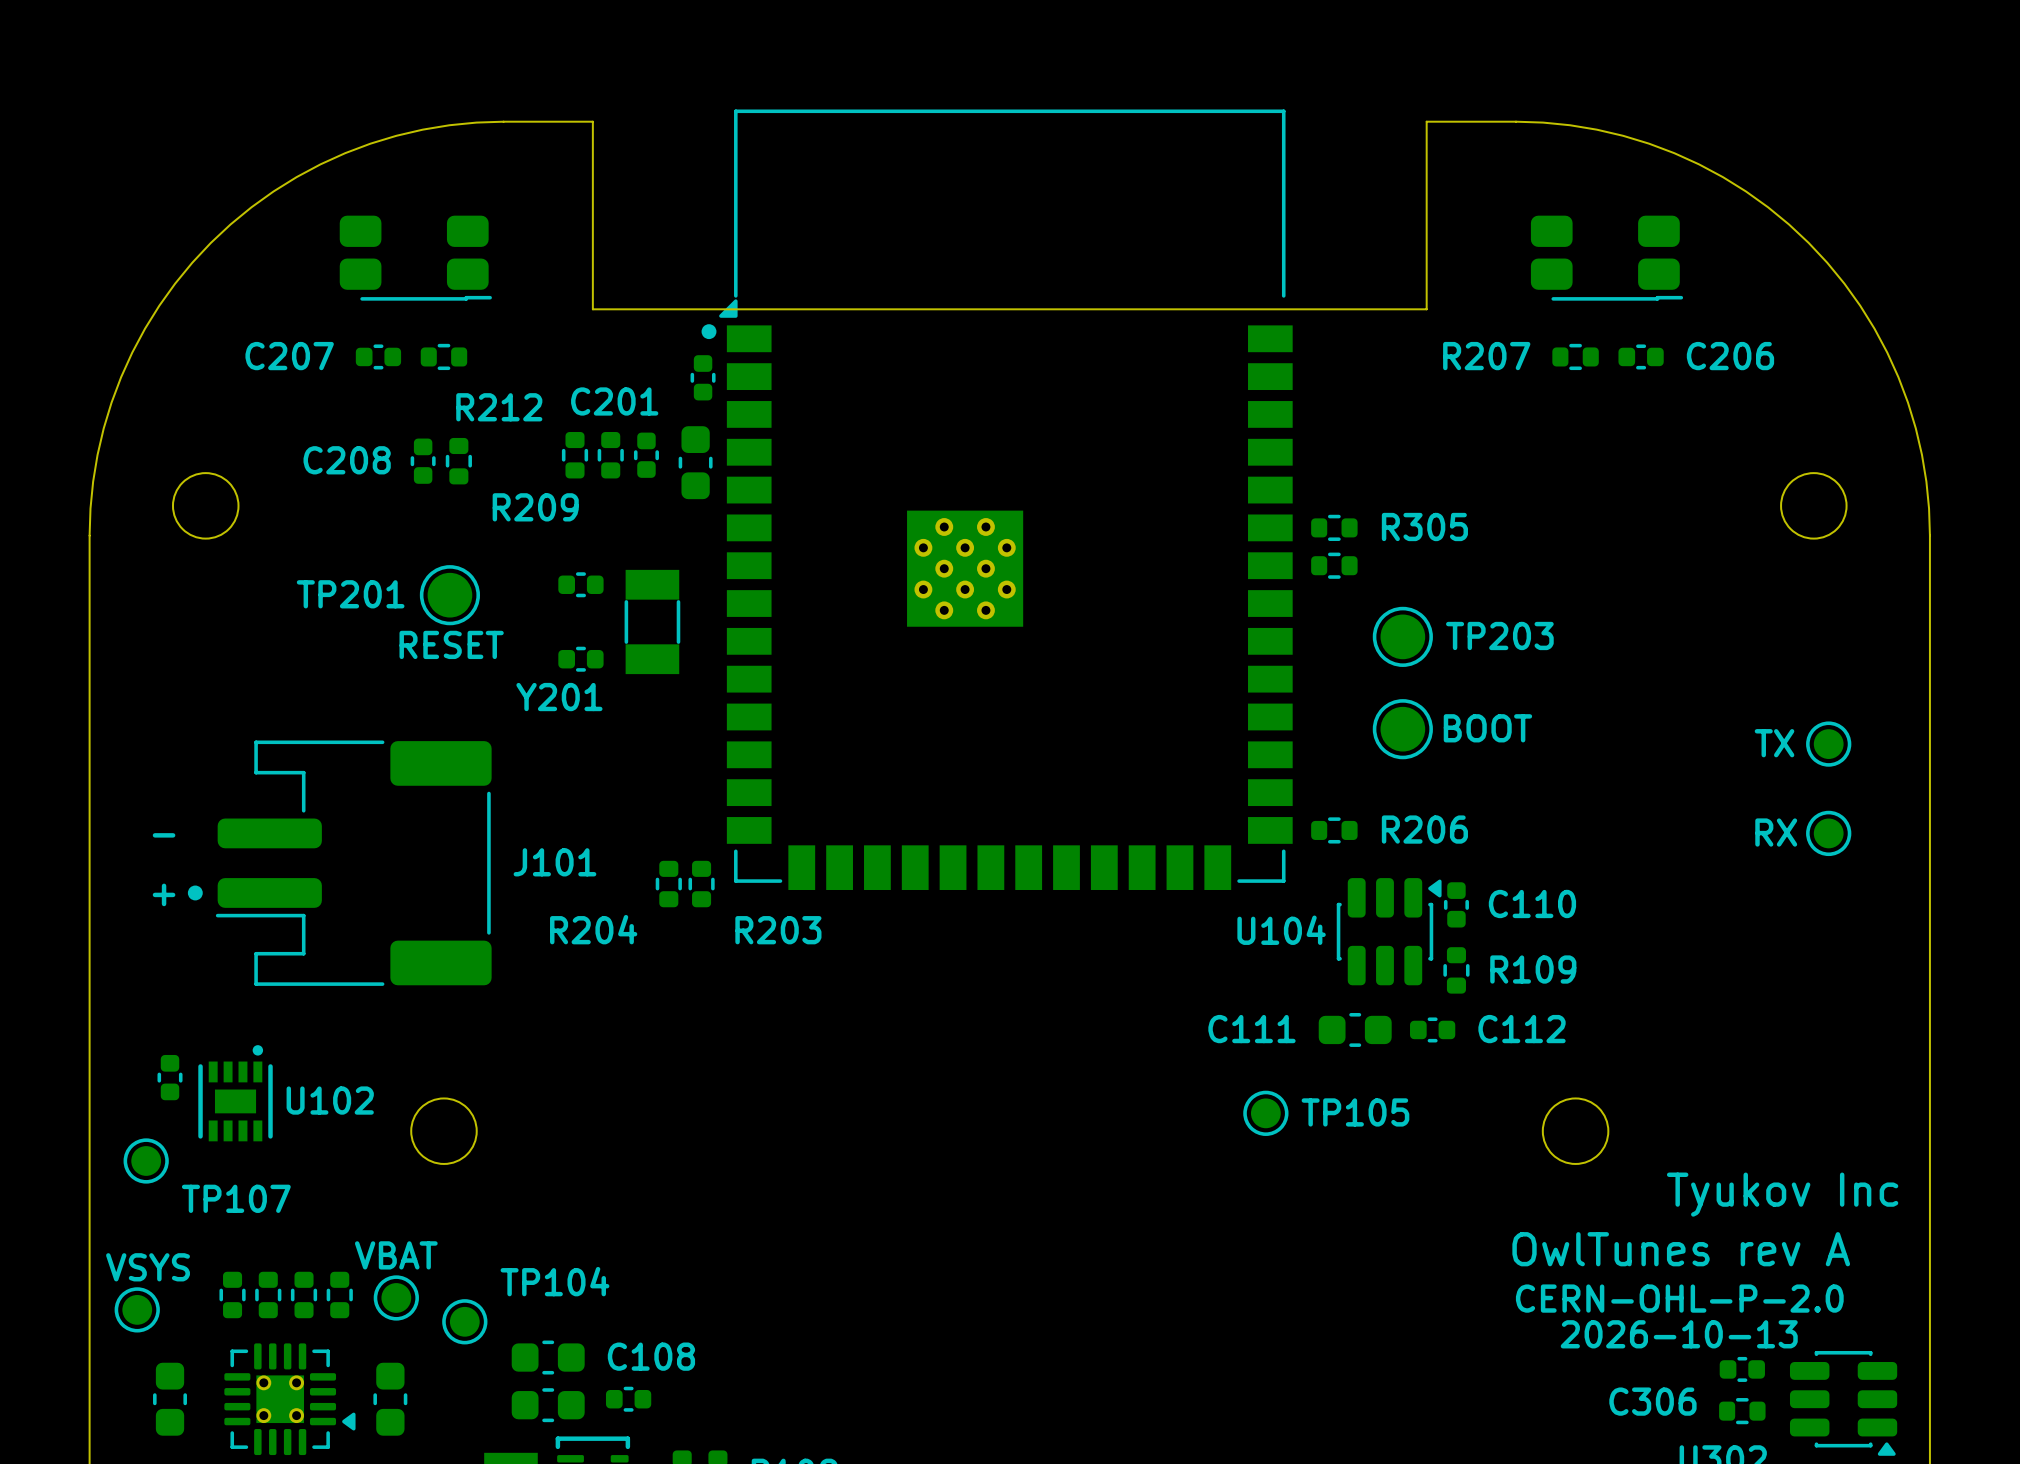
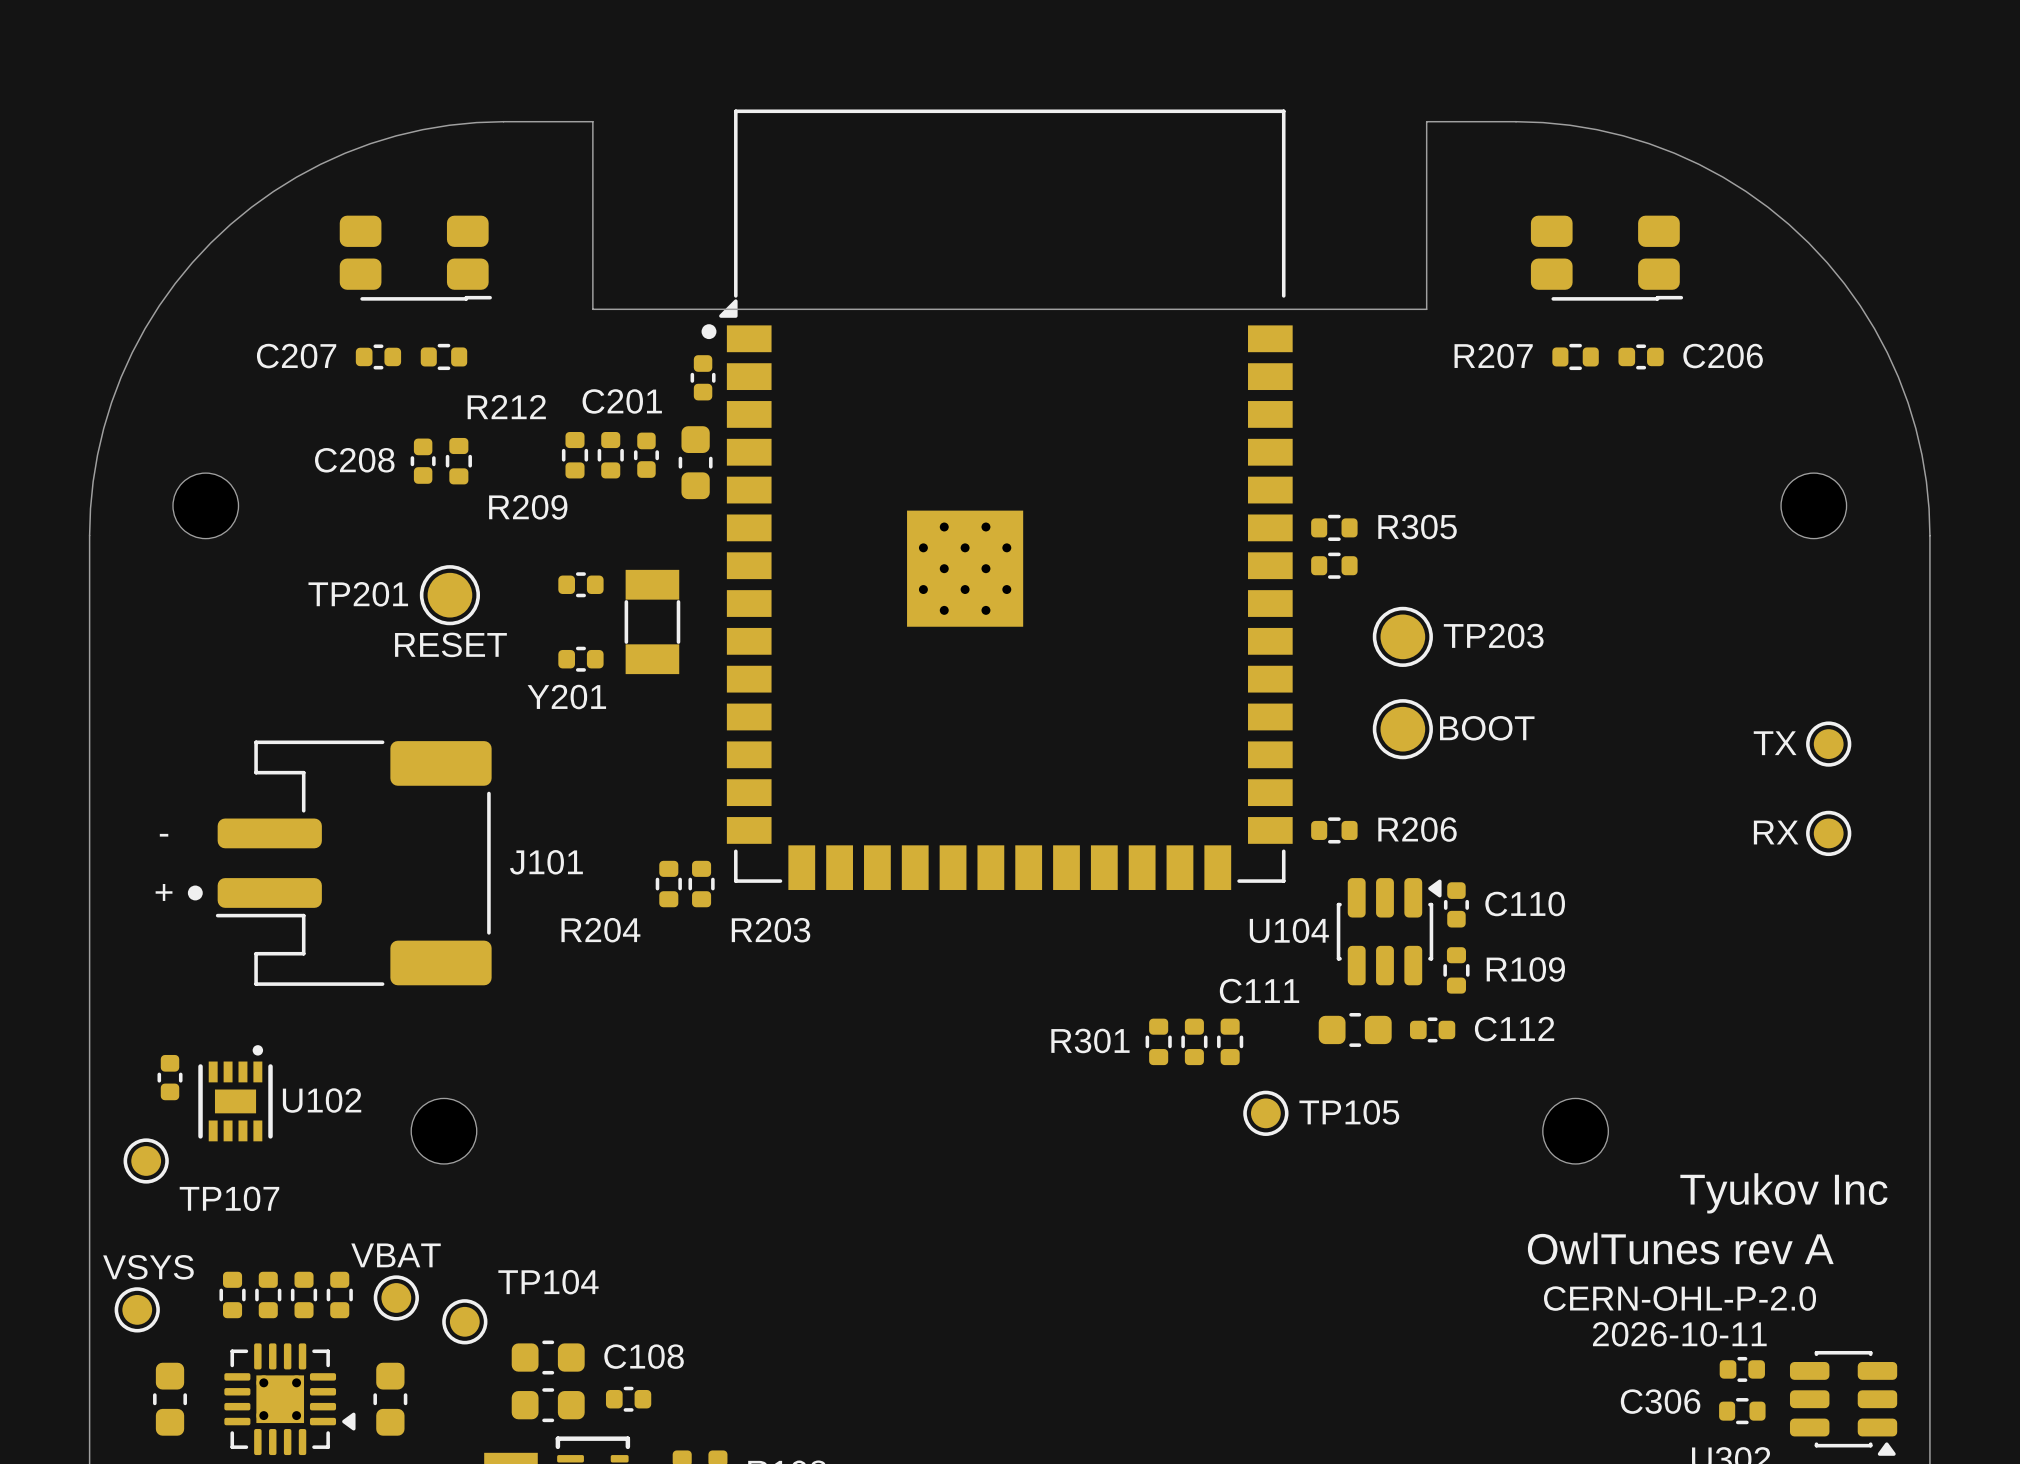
C111 name position: C111 (1251, 1029) -> C111 (1259, 991)
R301: none -> (1158, 1041)
part: none -> (1194, 1041)
part: none -> (1230, 1041)
text: 2026-10-13 (1679, 1334) -> 2026-10-11 (1679, 1334)

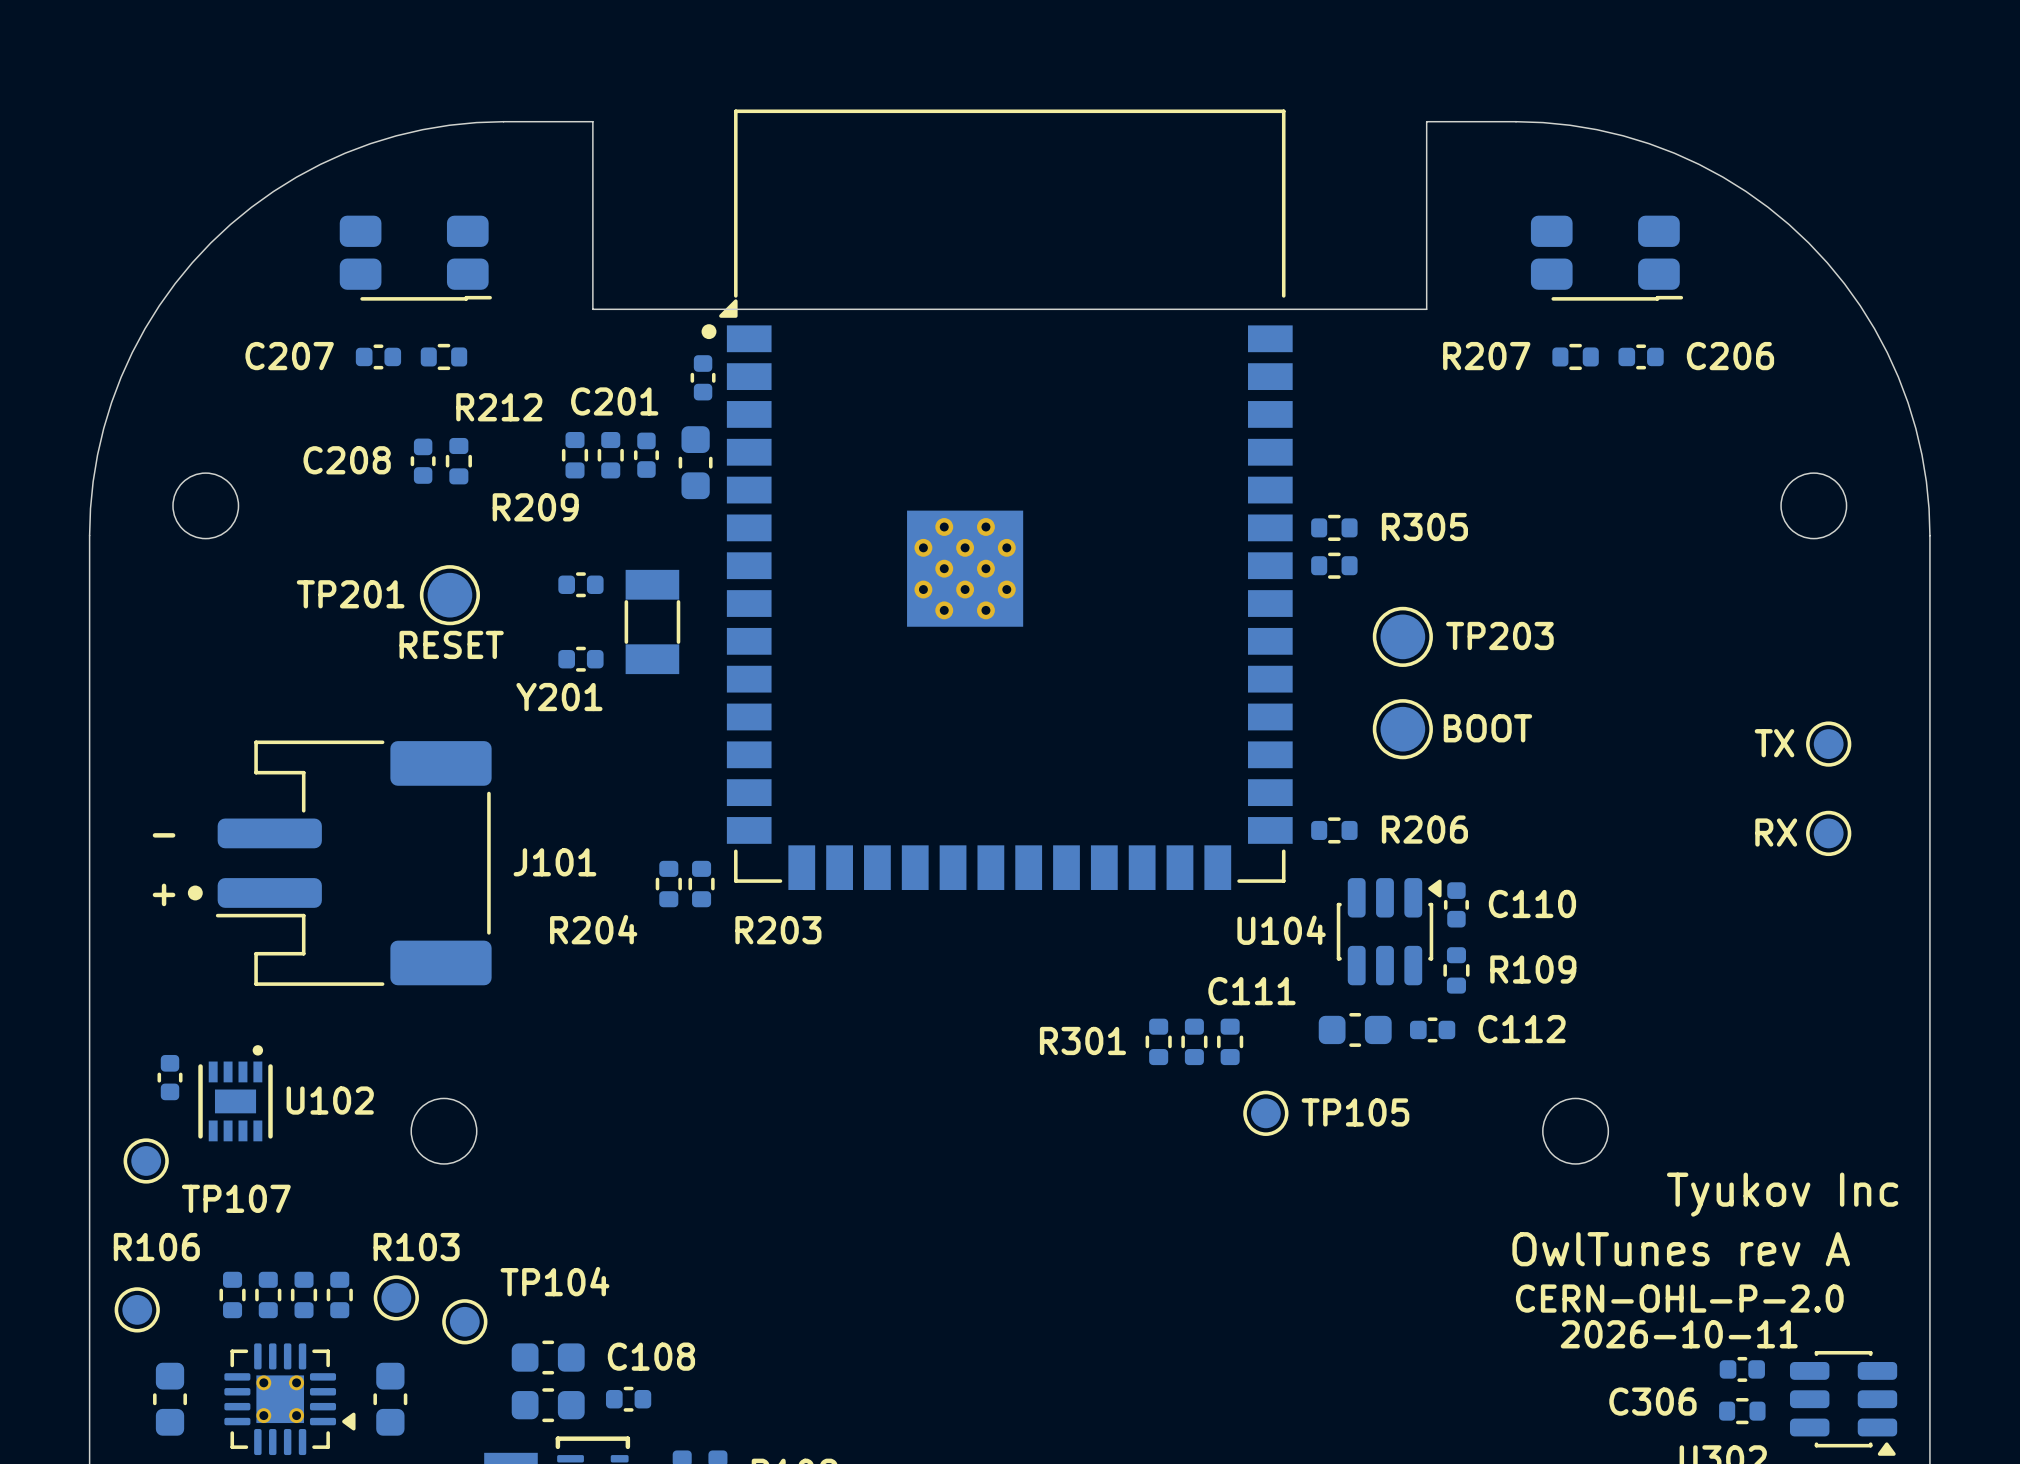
R106 name: none -> R106 (156, 1247)
R103 name: none -> R103 (416, 1247)
text: VBAT (396, 1255) -> none
text: VSYS (148, 1267) -> none

